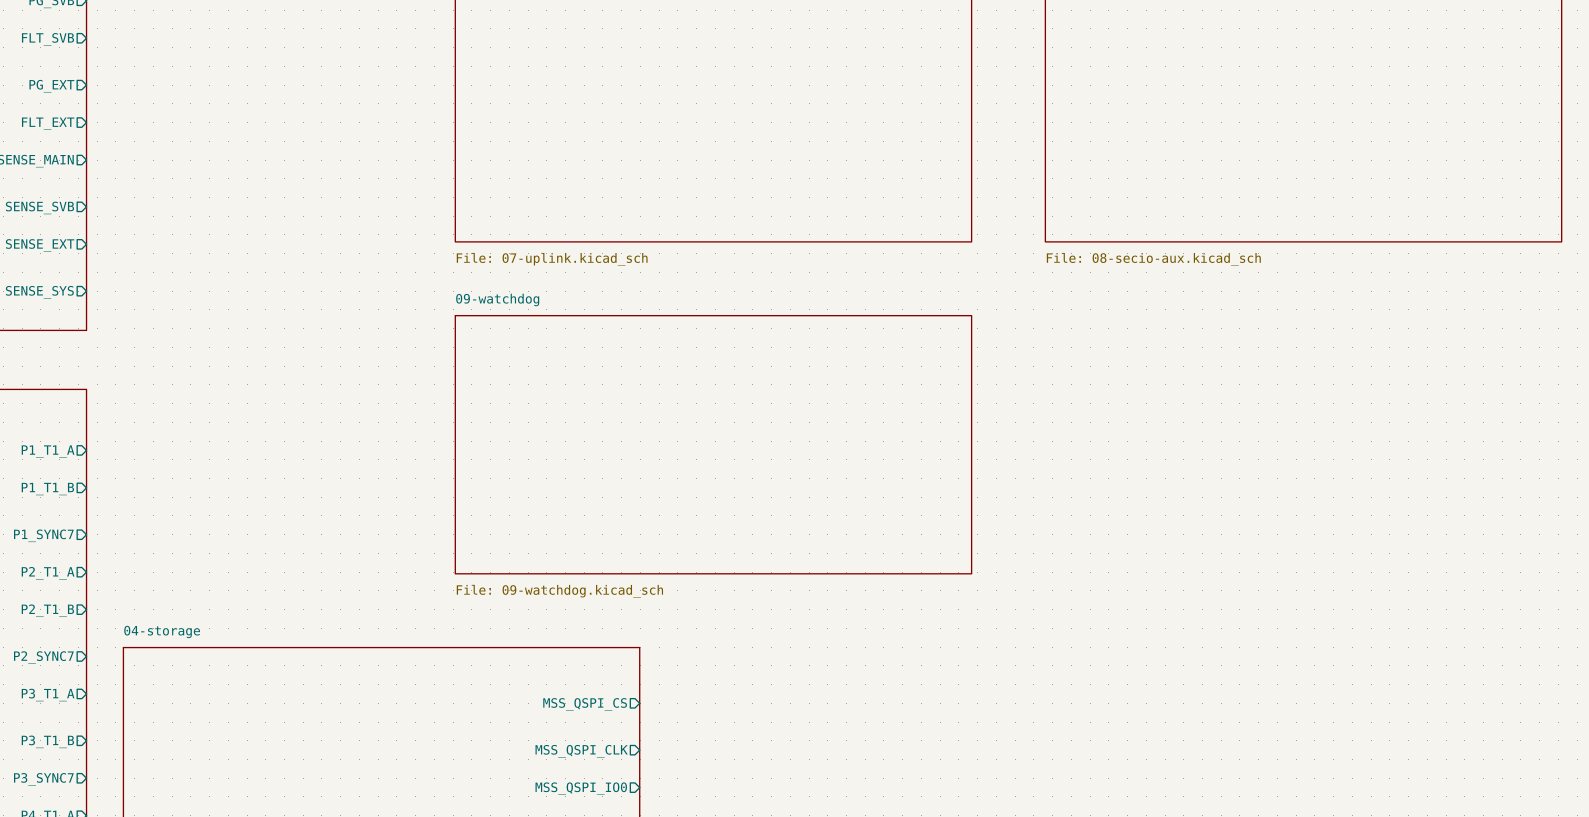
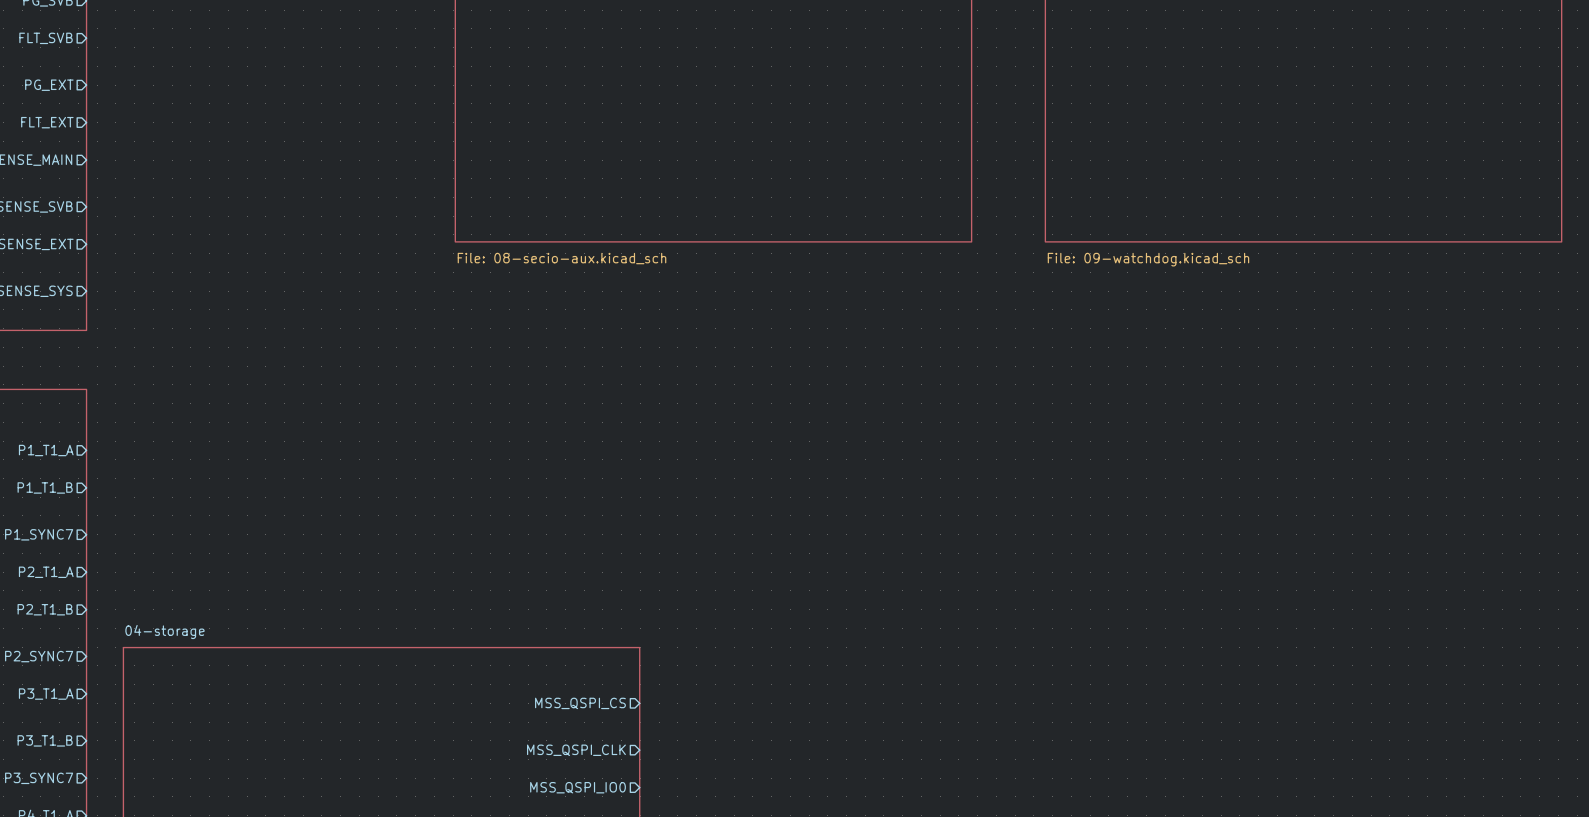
sheet value: File: 07-uplink.kicad_sch (552, 259) -> File: 08-secio-aux.kicad_sch (561, 258)
sheet value: File: 08-secio-aux.kicad_sch (1153, 259) -> File: 09-watchdog.kicad_sch (1148, 259)
sheet 09-watchdog: File: 09-watchdog.kicad_sch (713, 444) -> none

